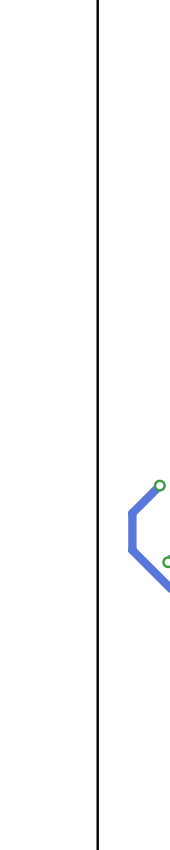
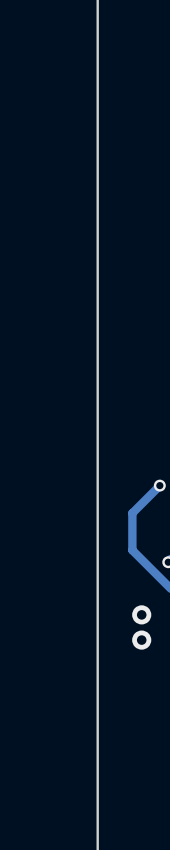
via: none -> (141, 614)
via: none -> (141, 640)

